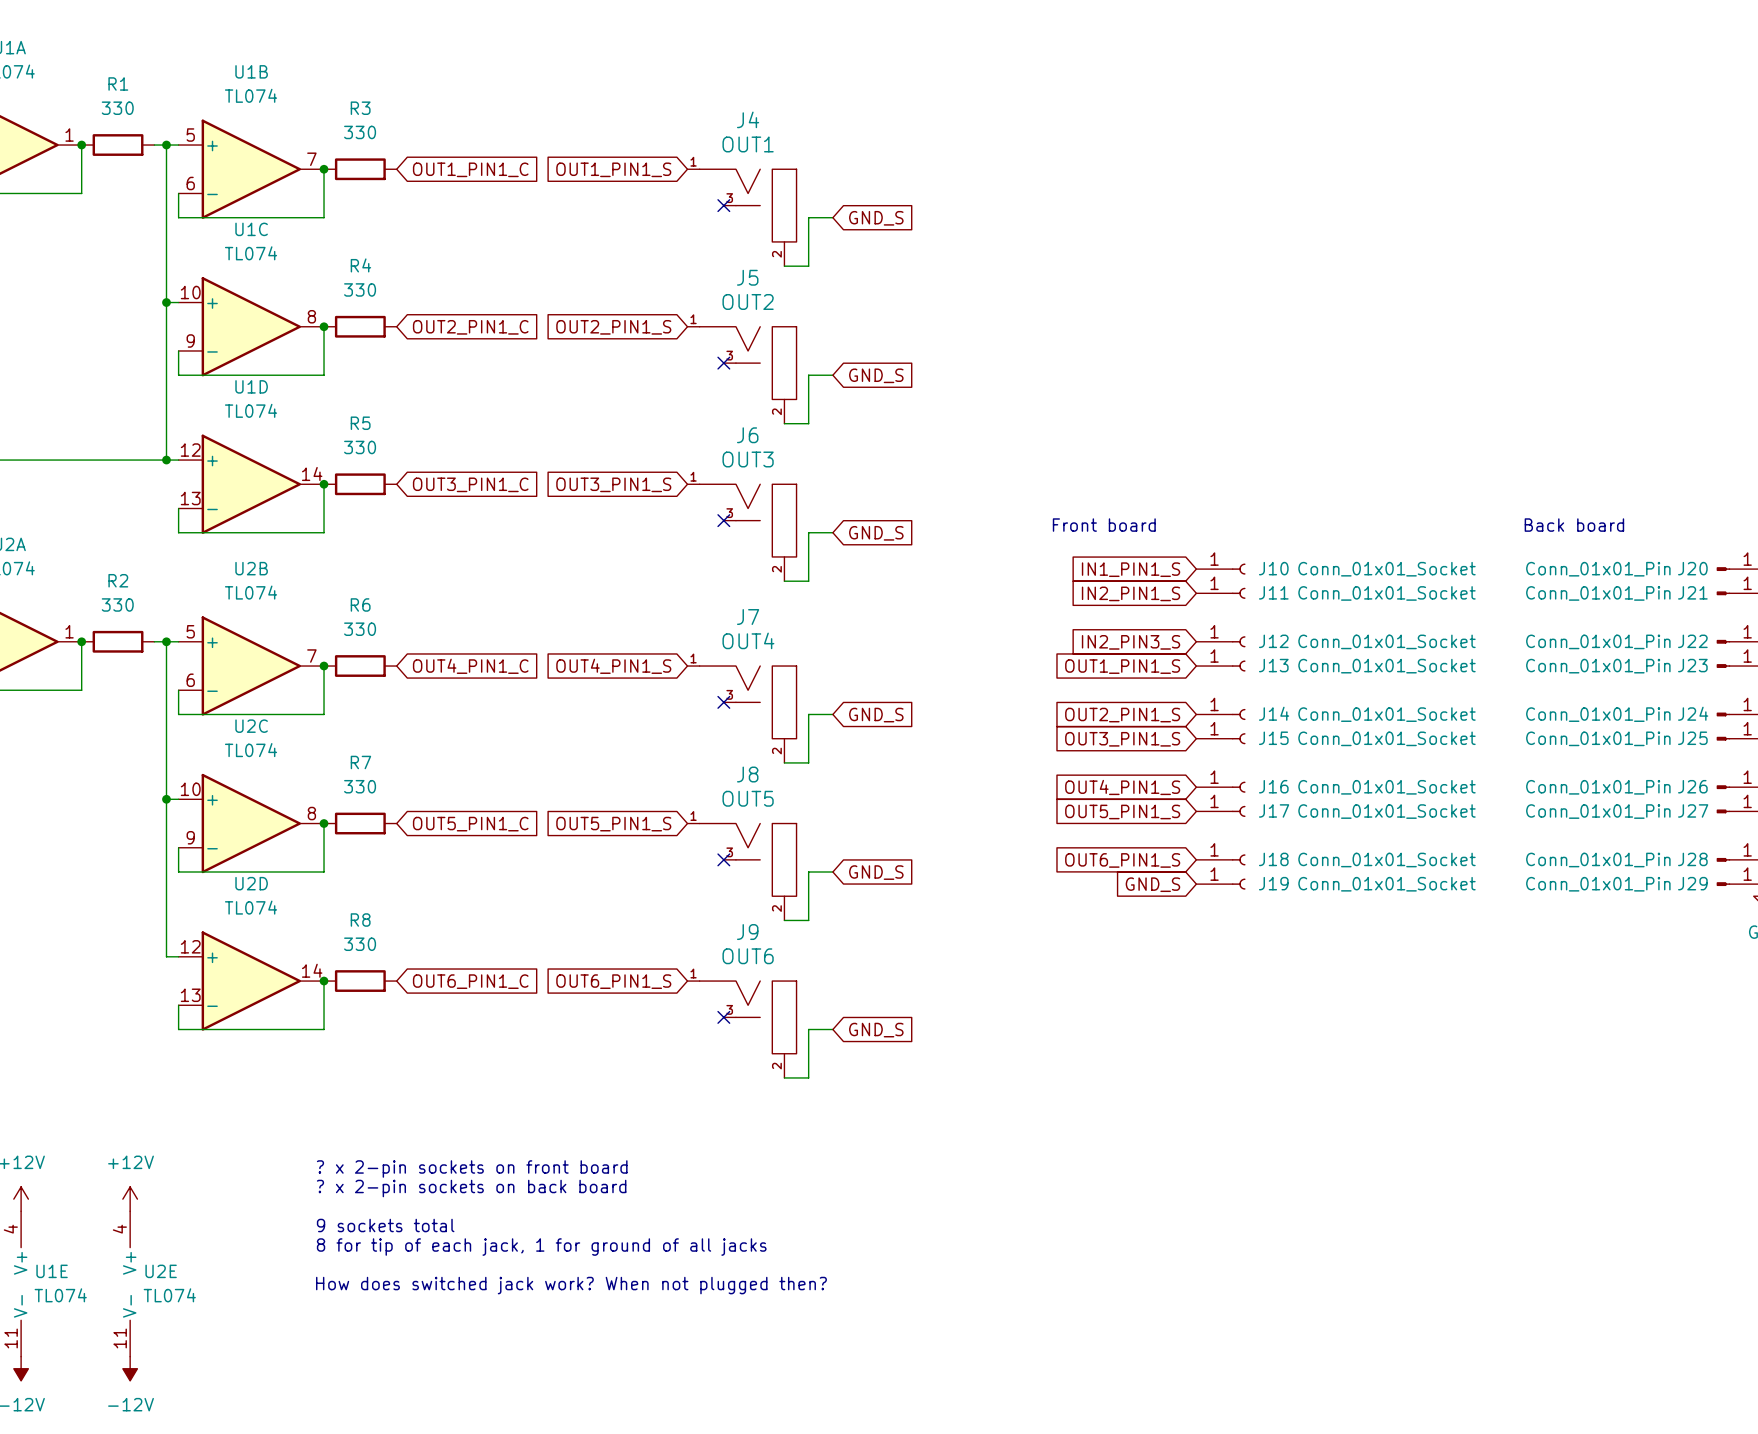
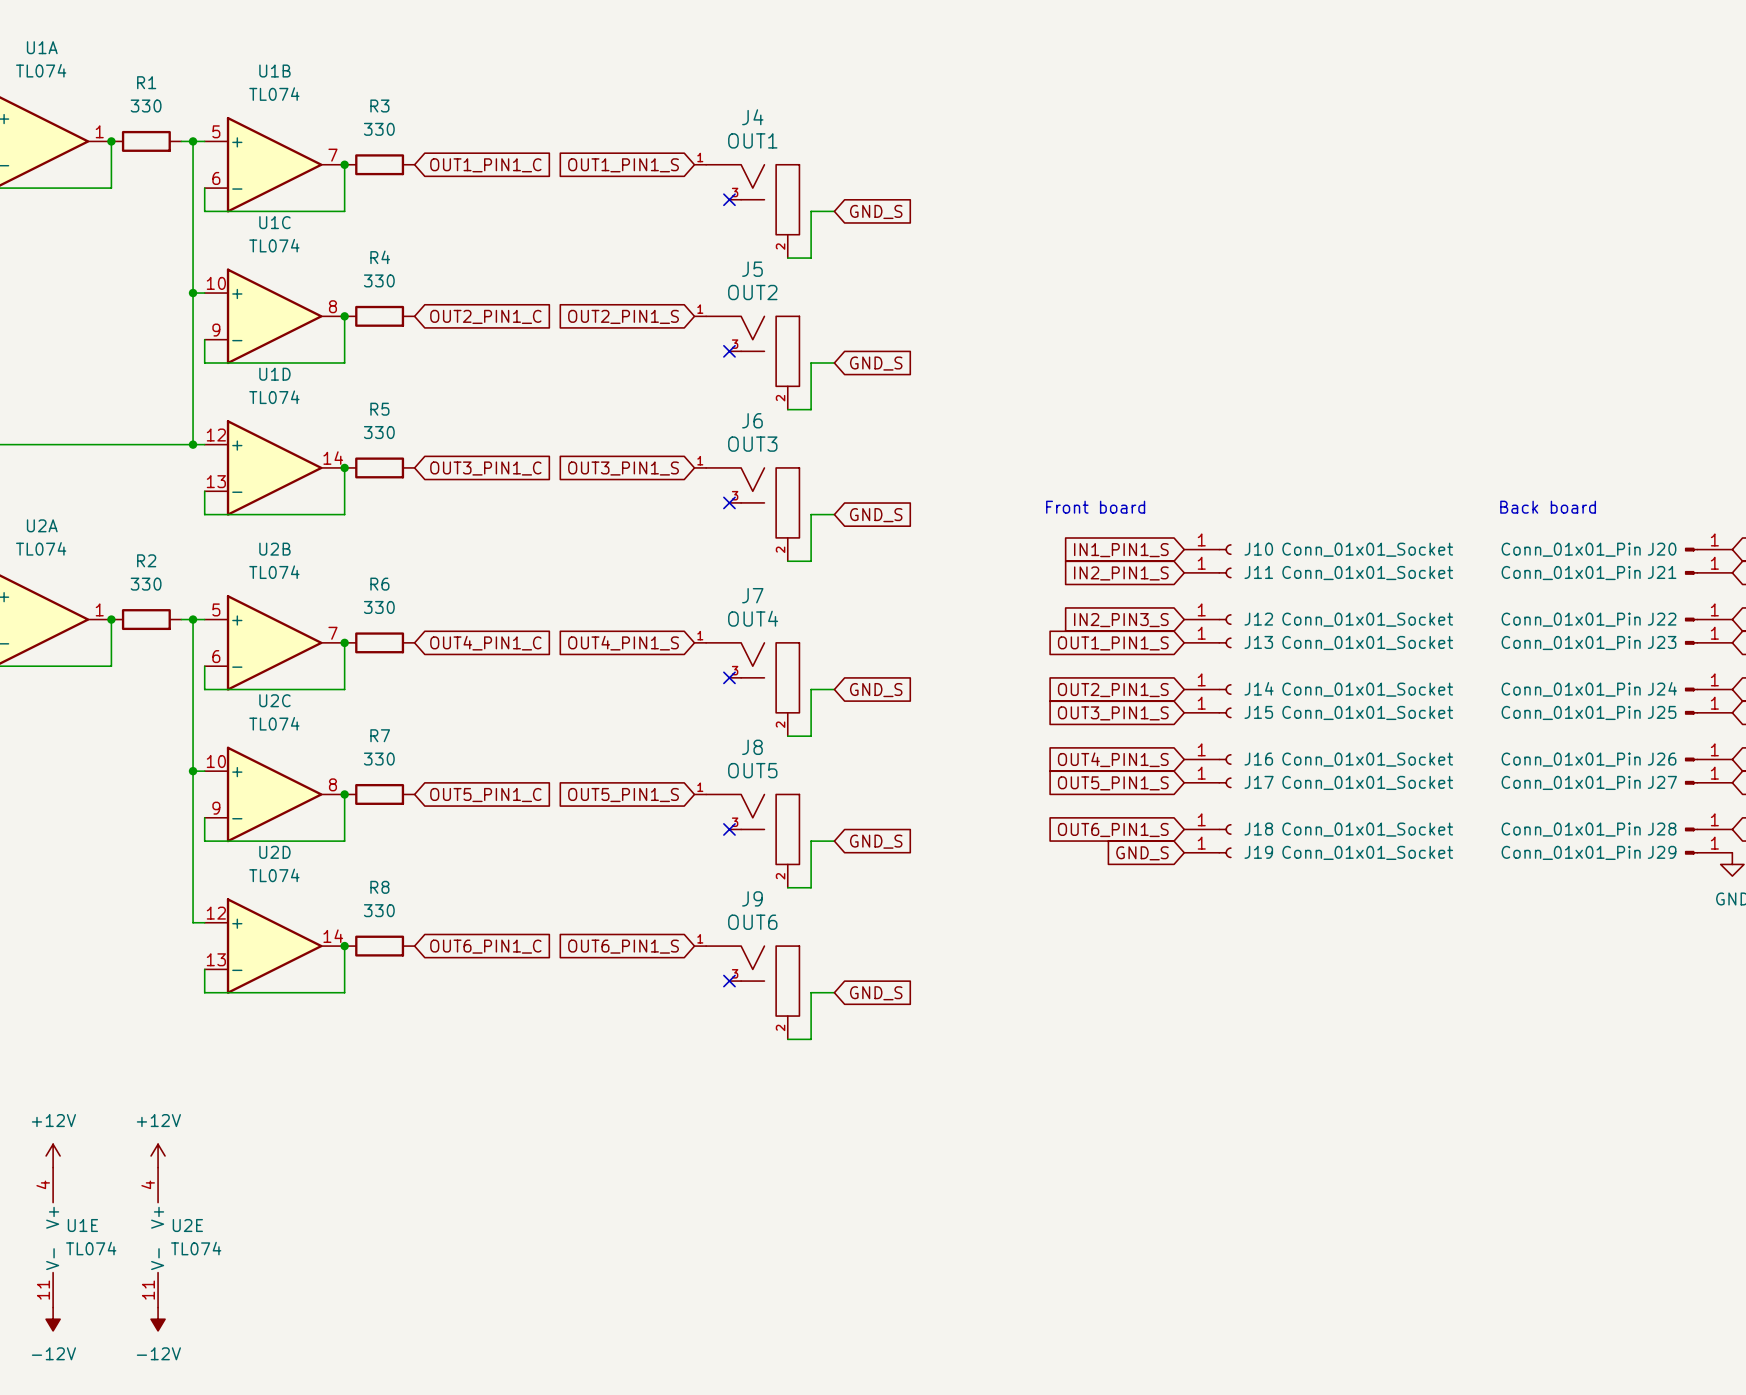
text: ? x 2-pin sockets on front board (472, 1168) -> none
text: ? x 2-pin sockets on back board (471, 1188) -> none
text: 9 sockets total (385, 1225) -> none
text: 8 for tip of each jack, 1 for ground of all jacks (541, 1247) -> none
text: How does switched jack work? When not plugged then? (571, 1285) -> none

